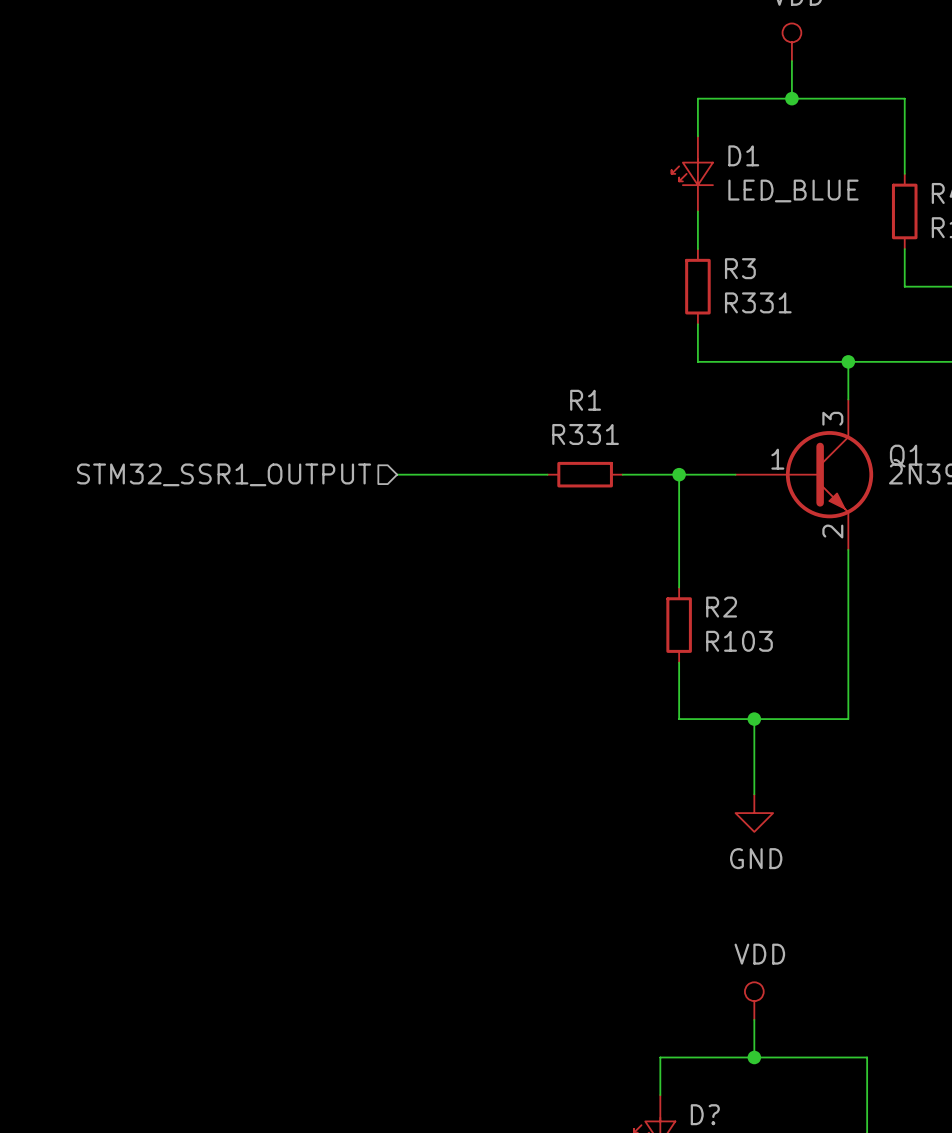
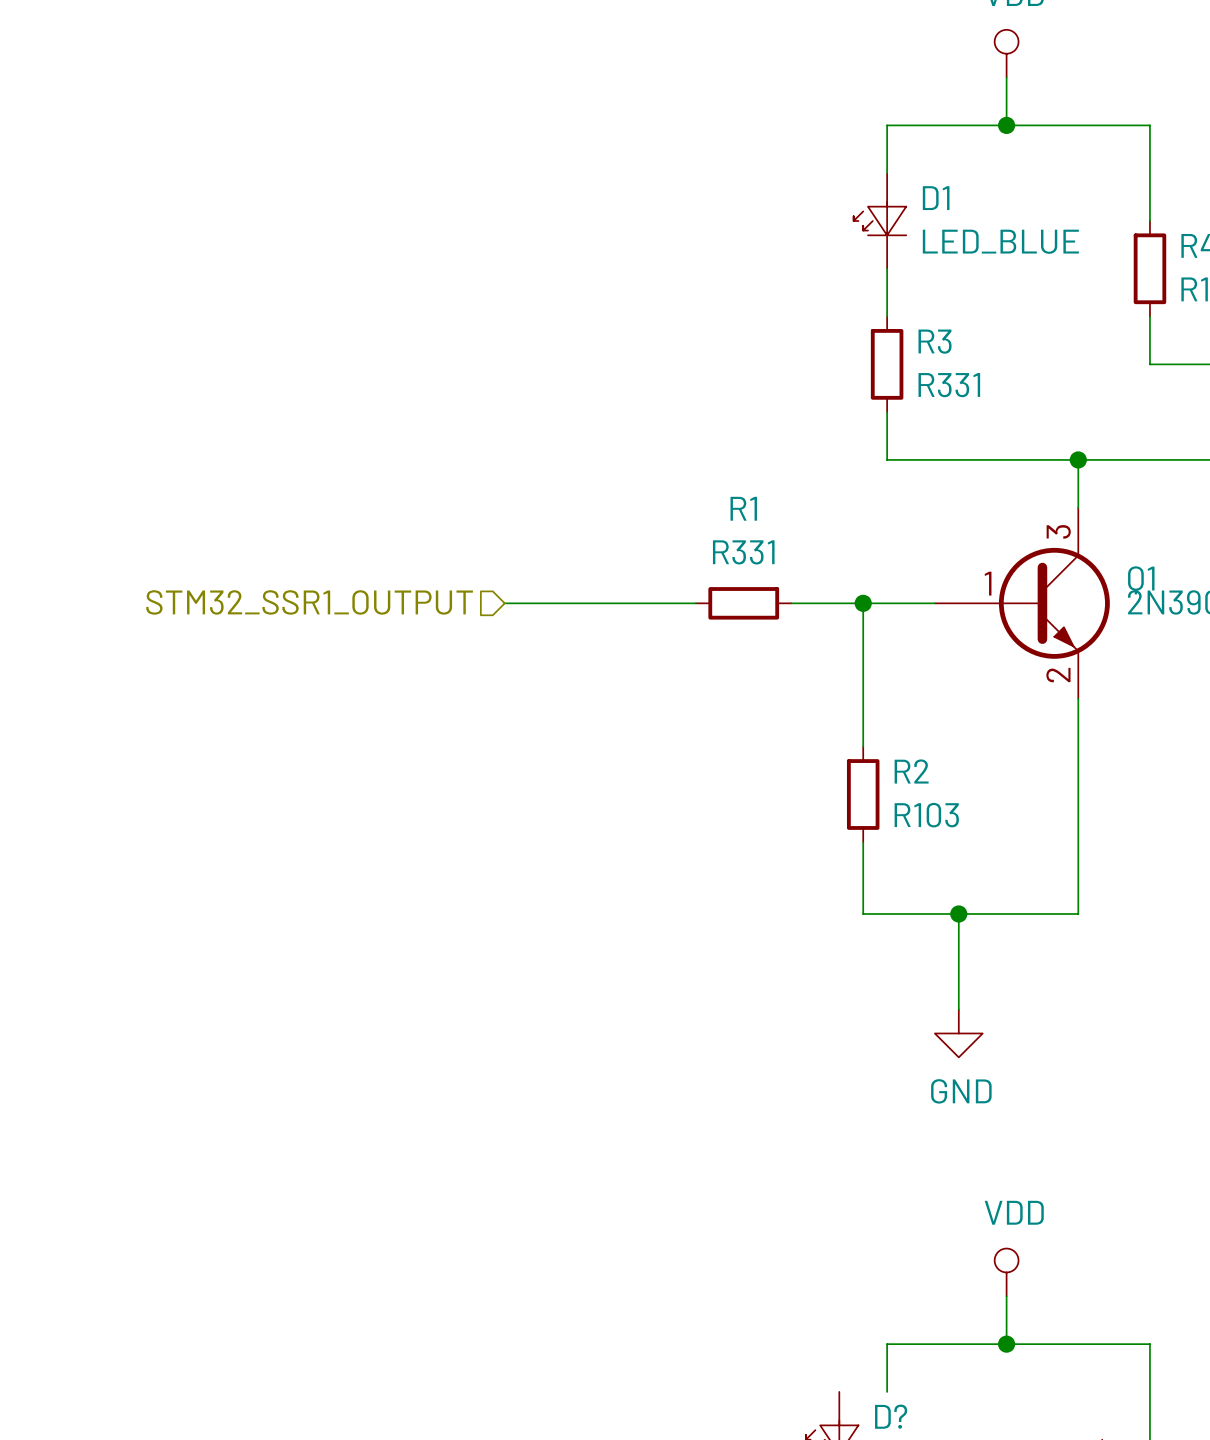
power symbol position: VDD (754, 1001) -> VDD (1006, 1272)
wire: (754, 1019) (754, 1057) -> (1006, 1296) (1006, 1344)
wire: (697, 1057) (660, 1057) (660, 1095) -> (887, 1344) (887, 1391)
junction position: (754, 1057) -> (1006, 1344)
wire: (867, 1057) (867, 1132) -> (1102, 1344) (1149, 1344) (1149, 1439)

